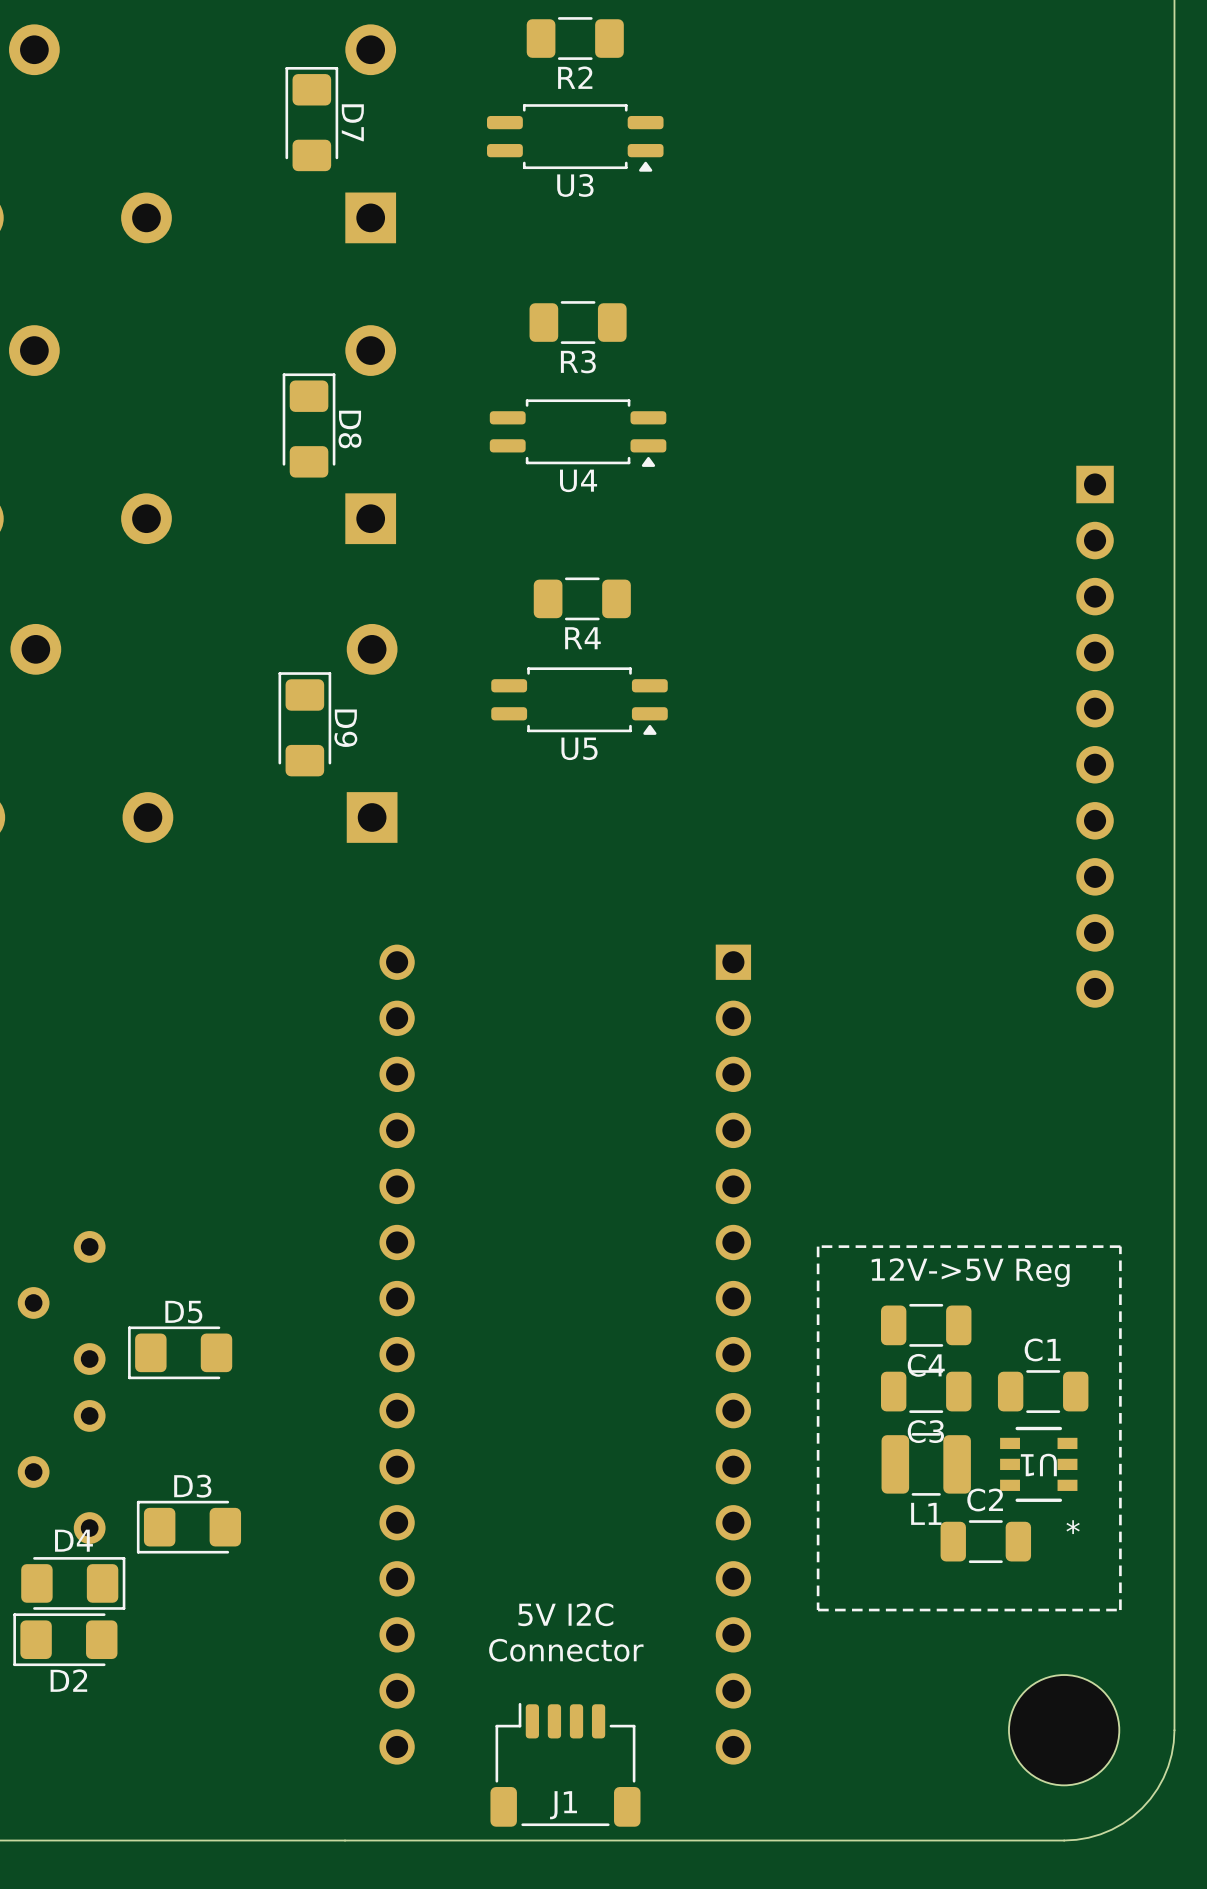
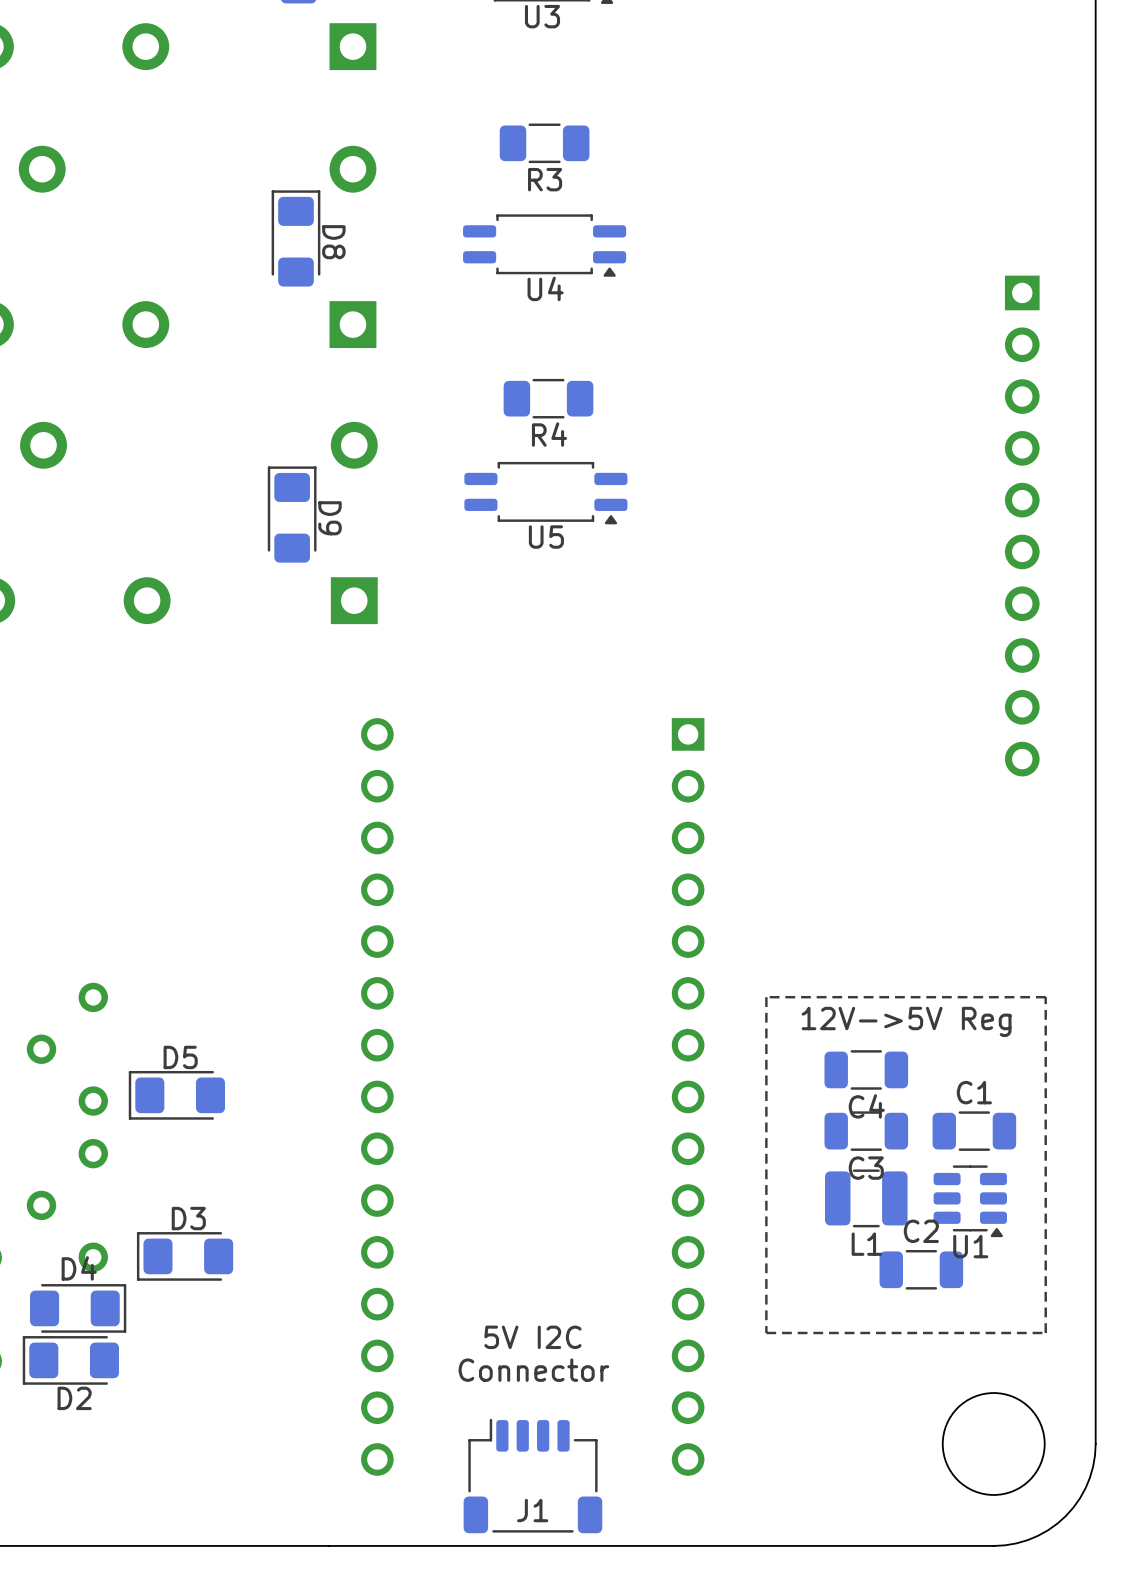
U1 footprint: [1000, 1426, 1078, 1502] -> [933, 1165, 1007, 1238]
U1 name position: U1 (1038, 1464) -> U1 (970, 1246)

